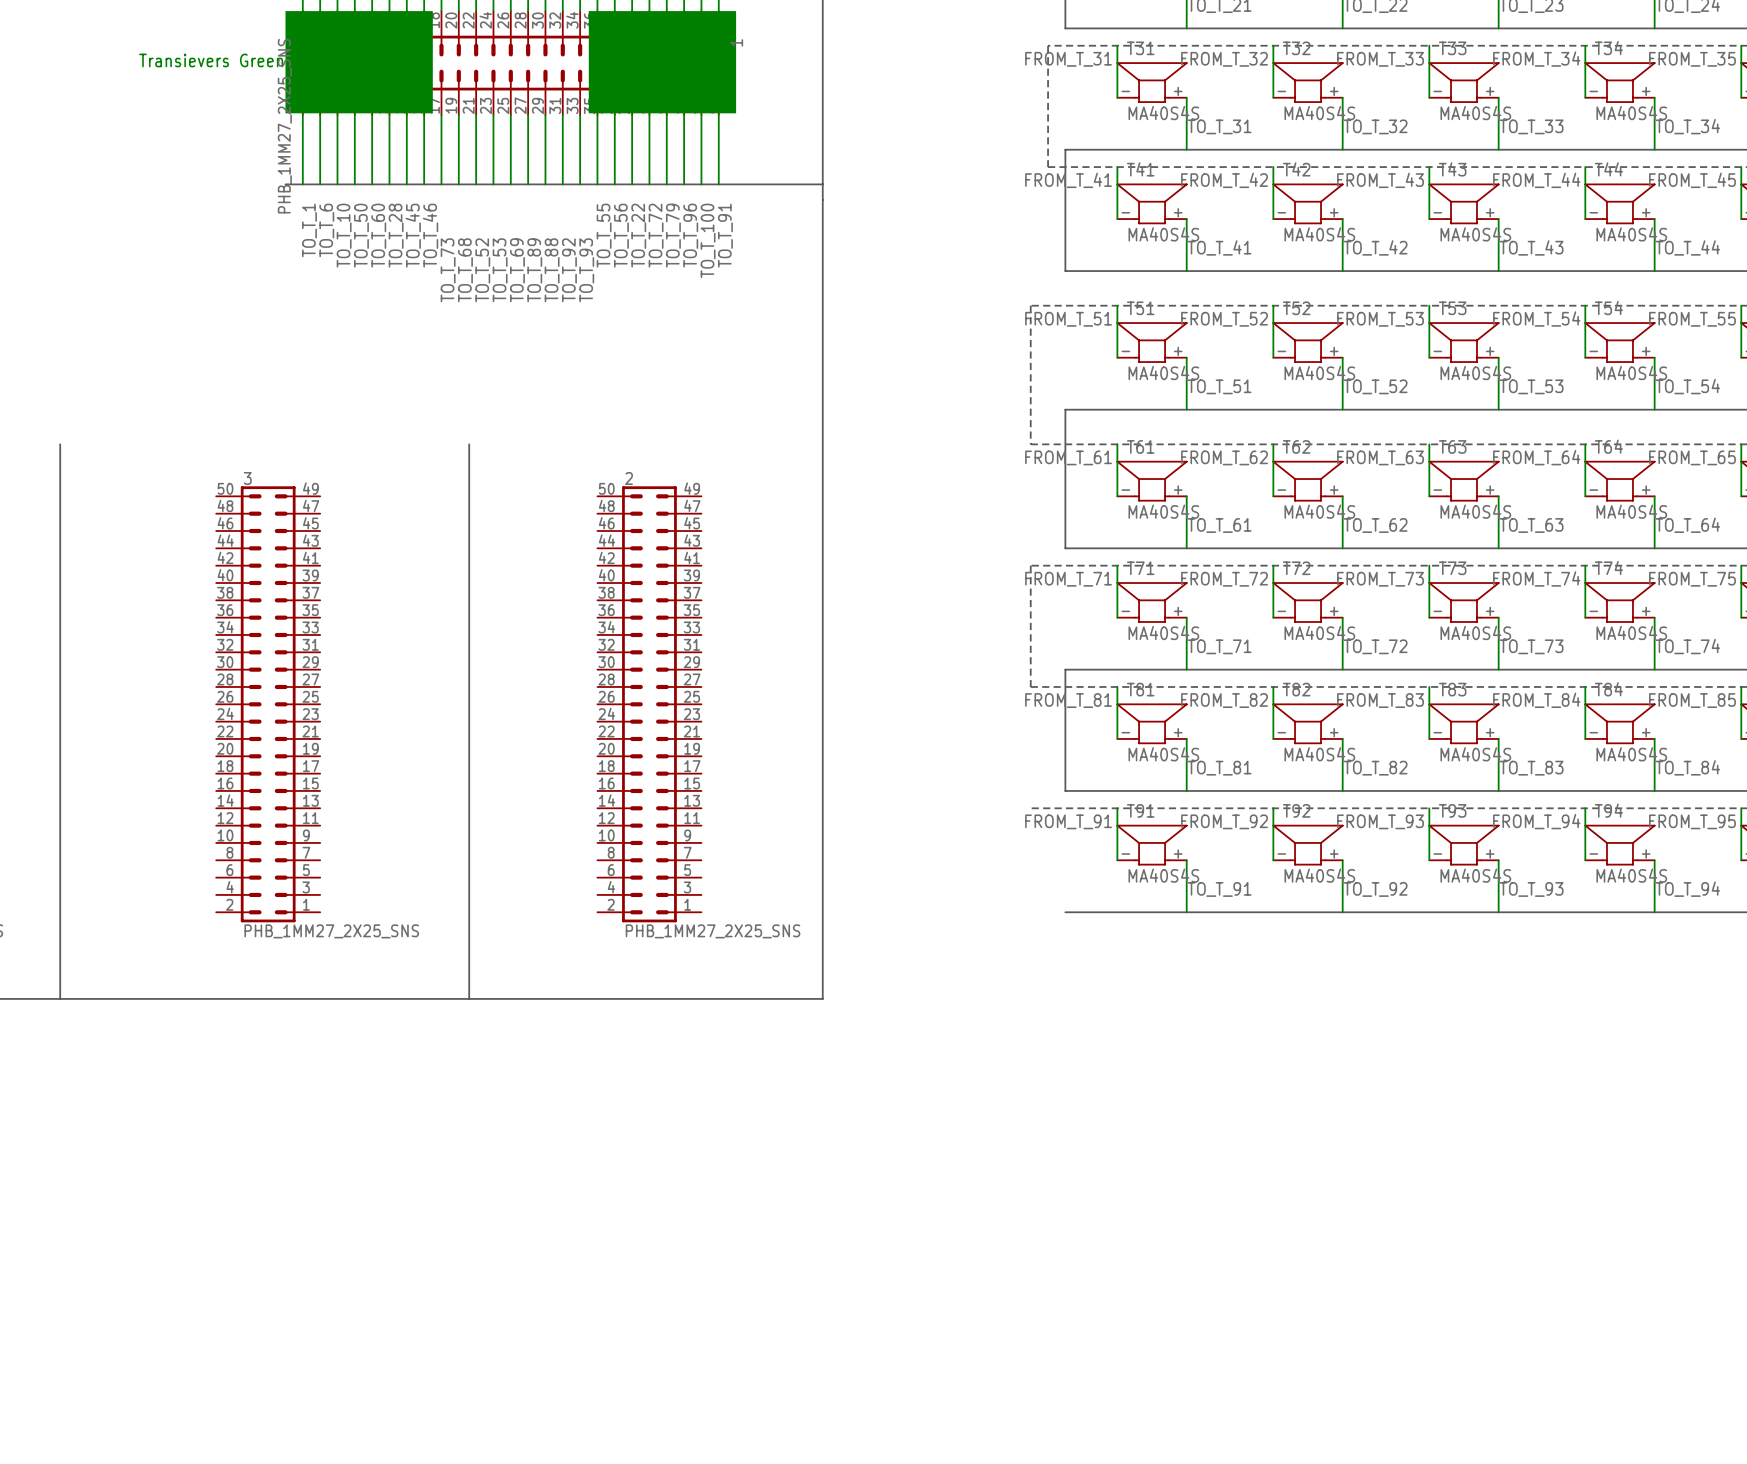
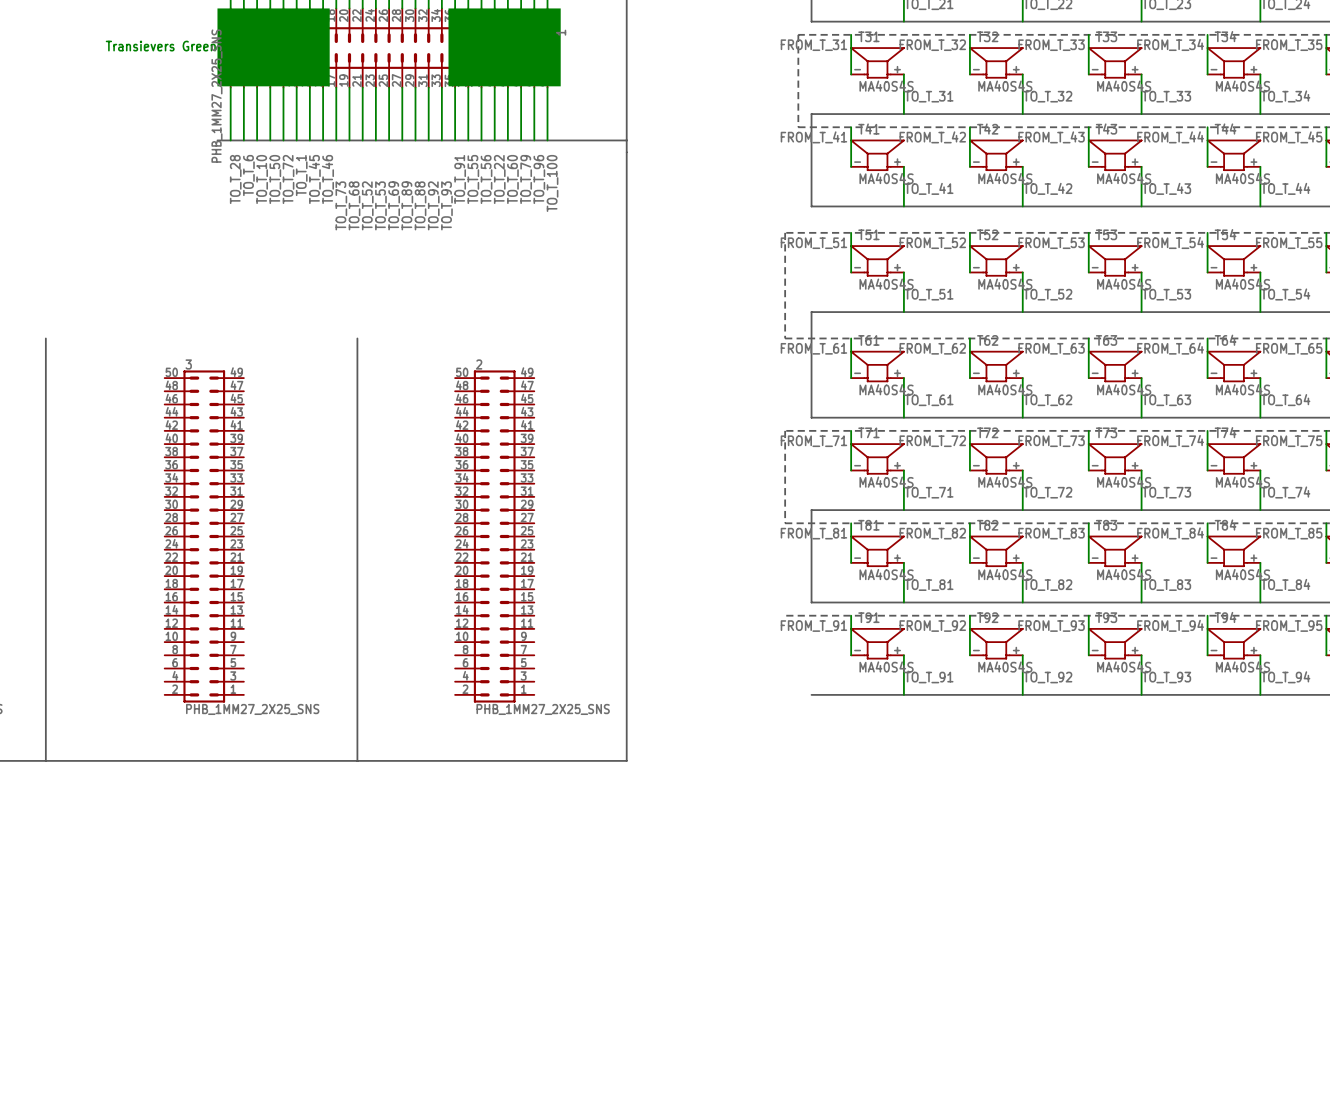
label: TO_T_1 (309, 230) -> TO_T_28 (235, 179)
label: TO_T_60 (378, 235) -> TO_T_72 (288, 179)
label: TO_T_28 (396, 235) -> TO_T_1 (301, 175)
label: TO_T_55 (604, 235) -> TO_T_91 (460, 179)
label: TO_T_56 (621, 235) -> TO_T_55 (473, 179)
label: TO_T_22 (638, 235) -> TO_T_56 (486, 179)
label: TO_T_72 (656, 235) -> TO_T_22 (499, 179)
label: TO_T_79 (673, 235) -> TO_T_60 (512, 179)
label: TO_T_96 (690, 235) -> TO_T_79 (526, 179)
label: TO_T_91 (725, 235) -> TO_T_100 (552, 183)
label: TO_T_100 (708, 240) -> TO_T_96 (539, 179)

